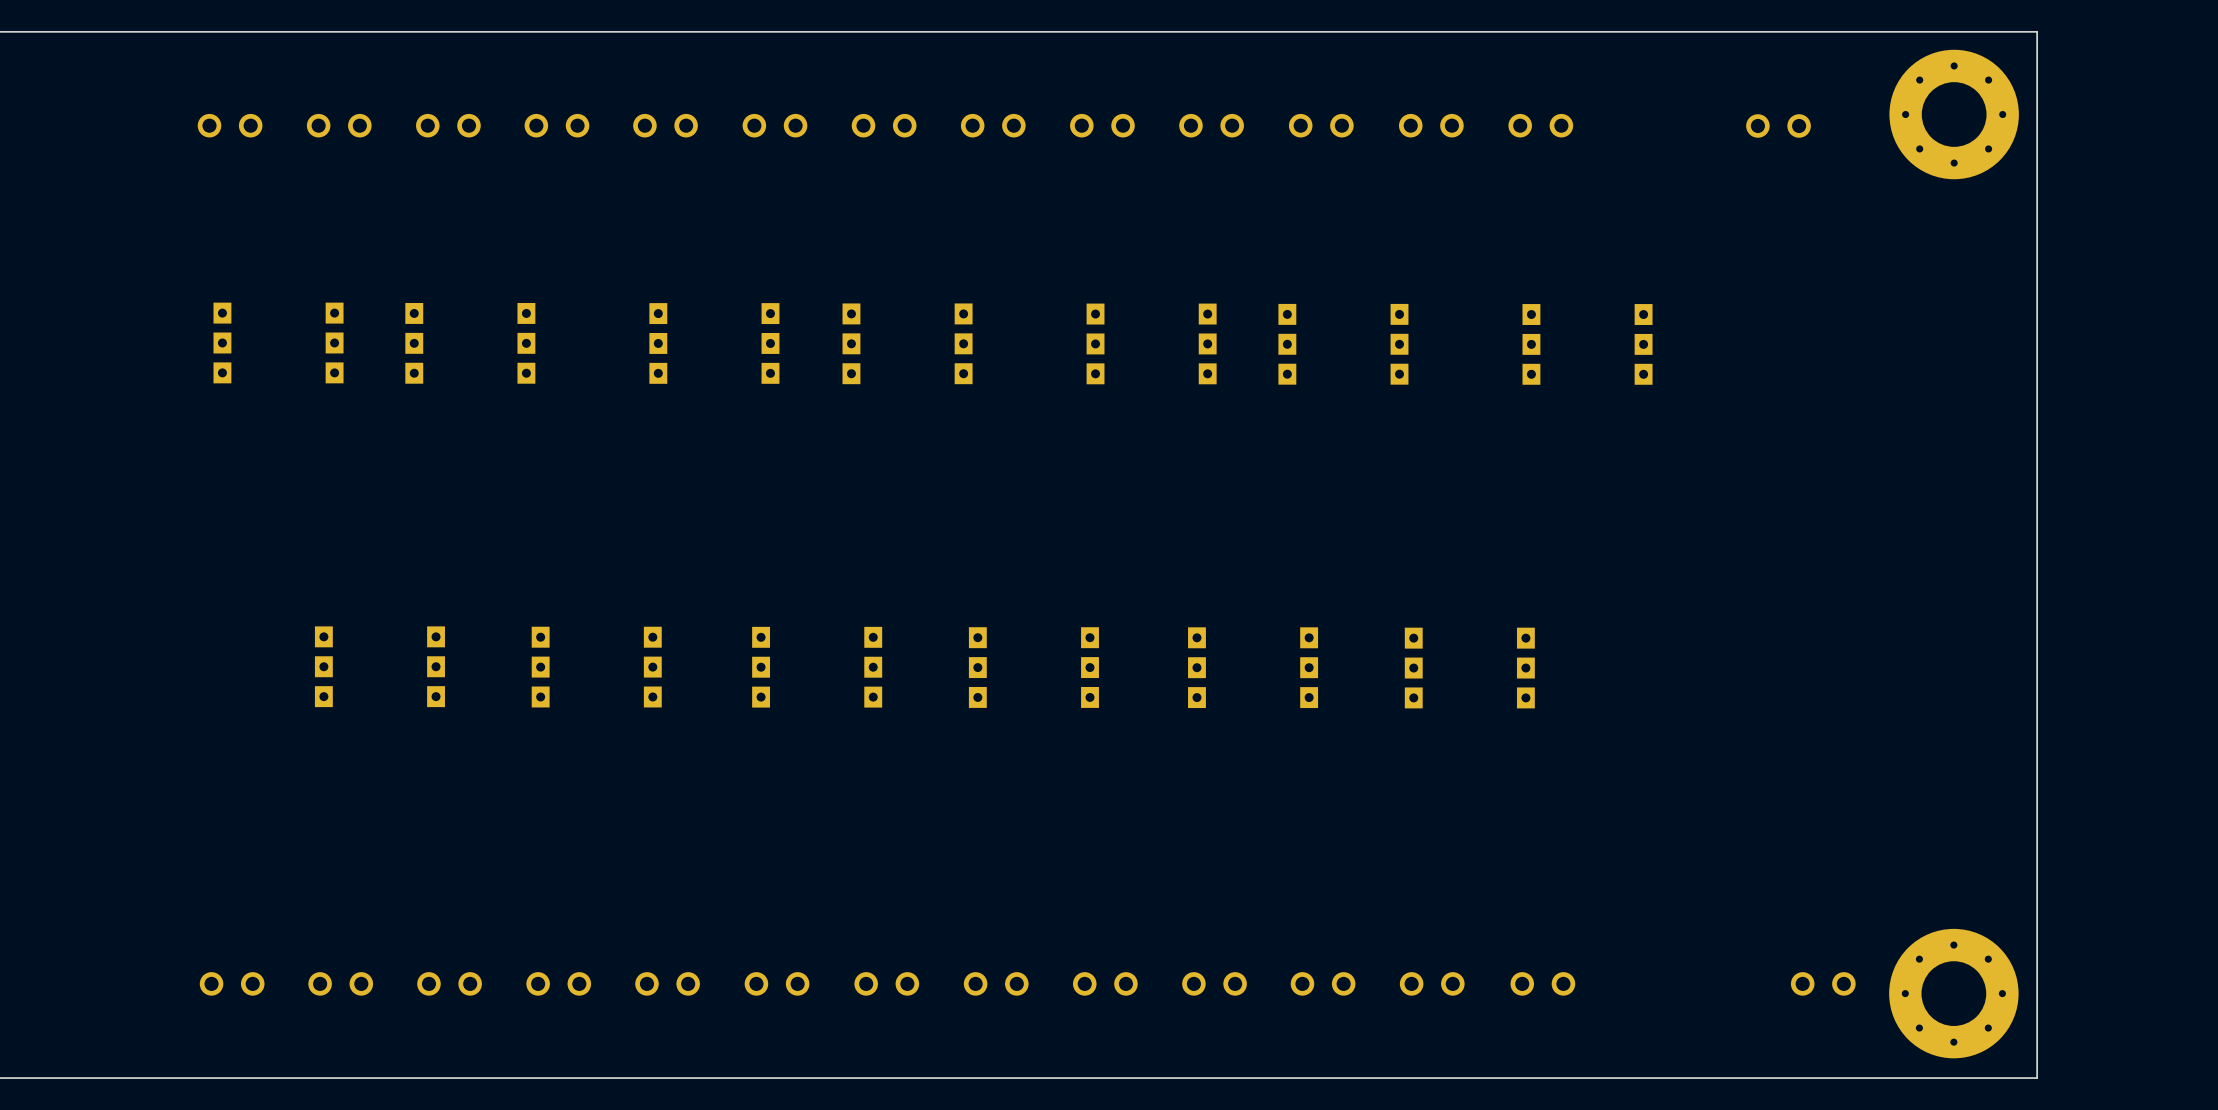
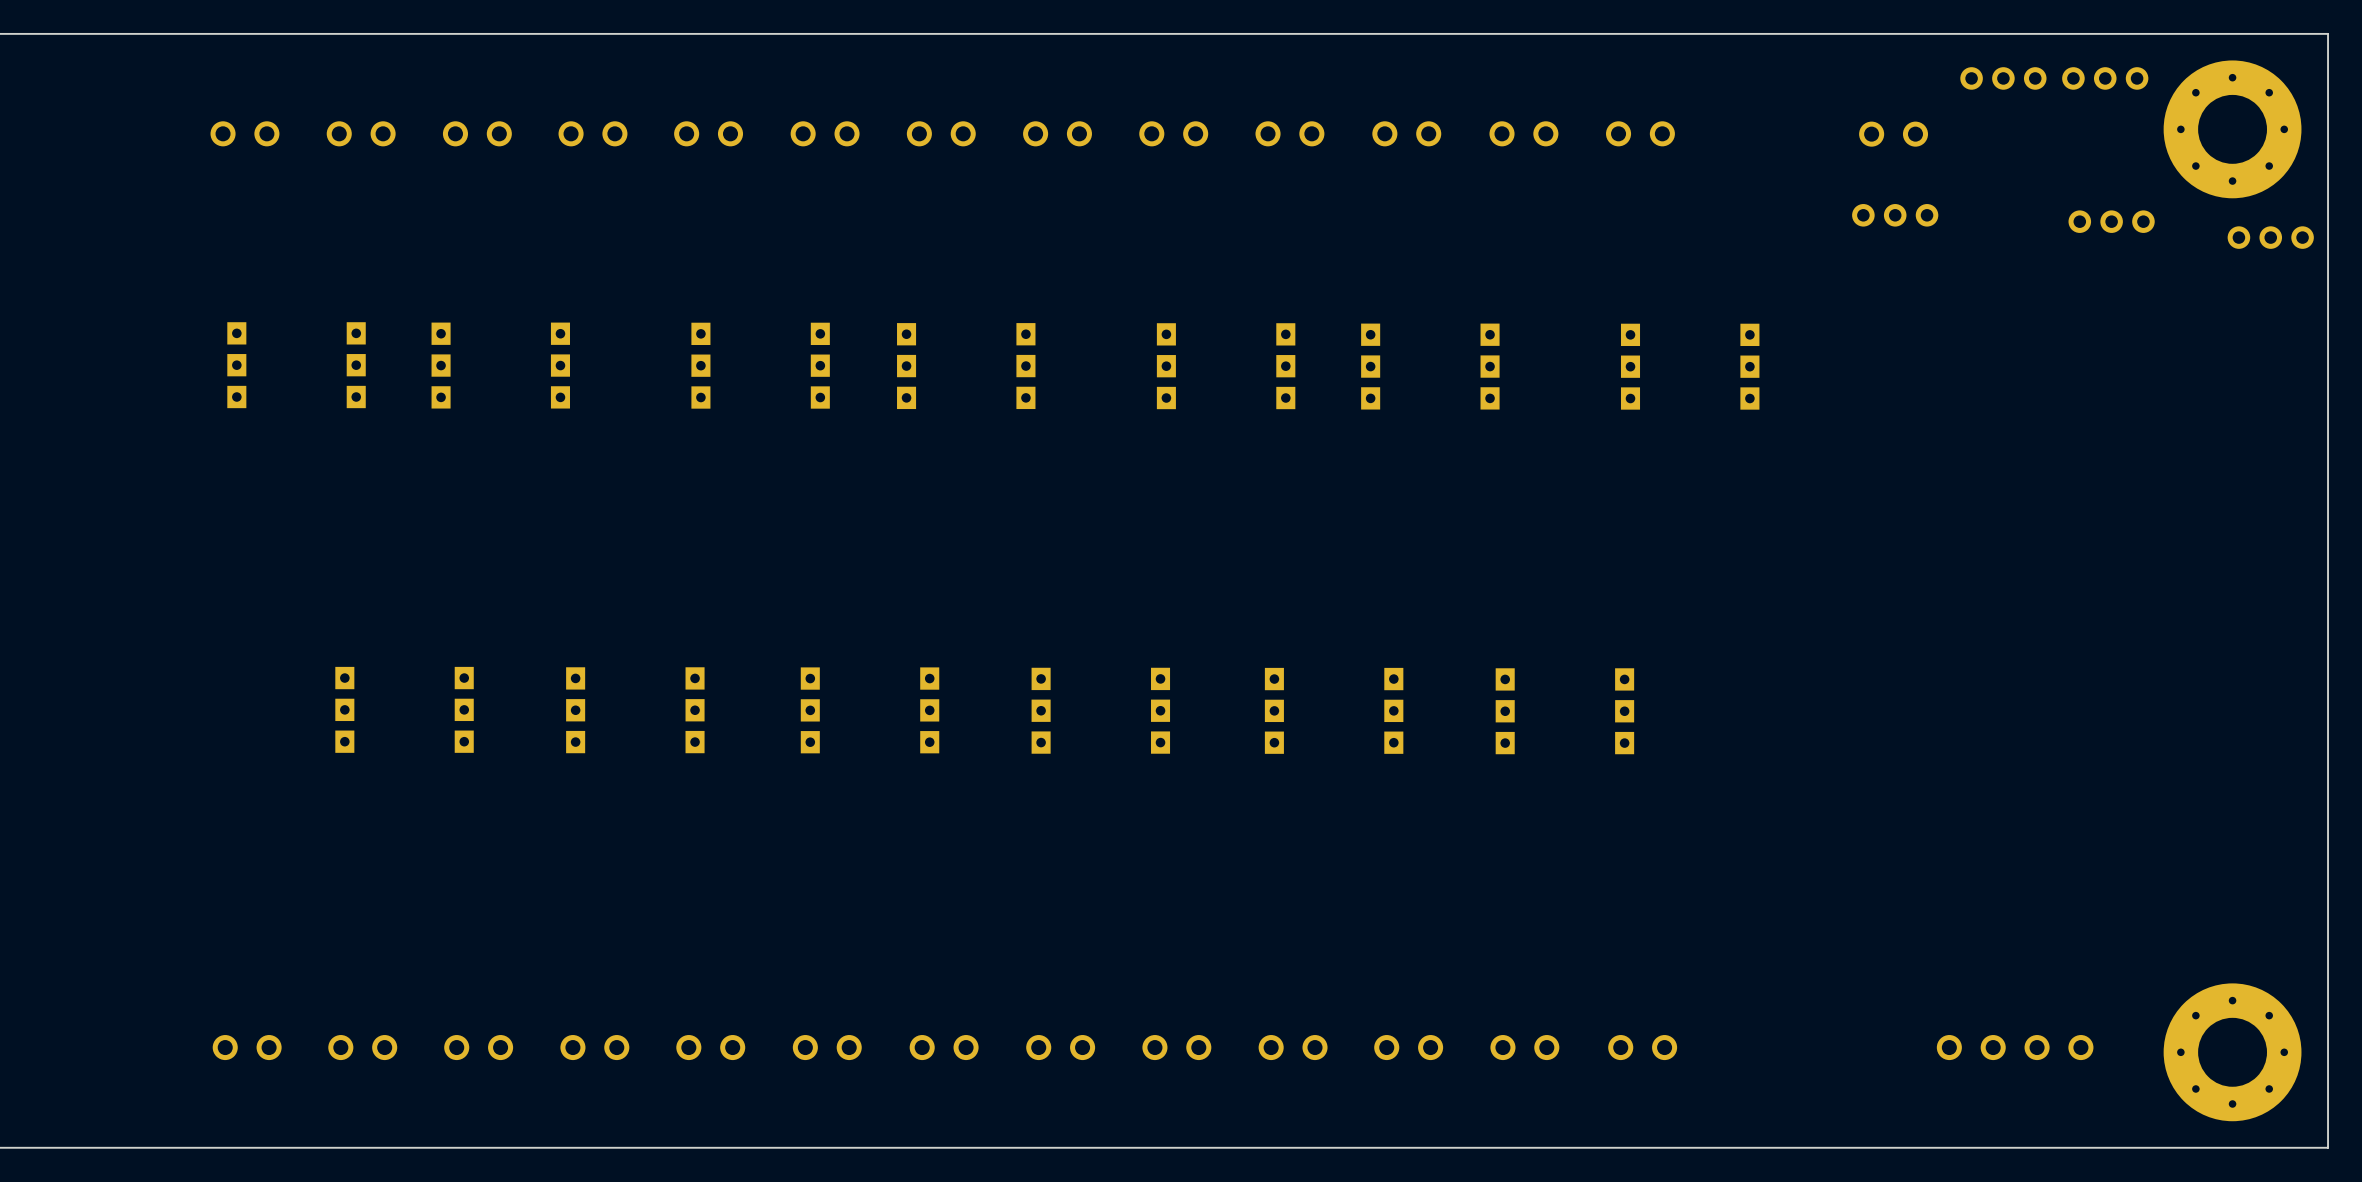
board edge: (2037, 31) (2037, 1078) -> (2168, 33) (2328, 33) (2328, 1147) (2168, 1147)
part: none -> (2003, 78)
part: none -> (2105, 78)
part position: (1954, 114) -> (2232, 129)
part: none -> (1895, 215)
part: none -> (2111, 221)
part: none -> (2270, 237)
part: (1823, 983) -> none
part: none -> (2015, 1047)
part position: (1953, 993) -> (2232, 1052)

